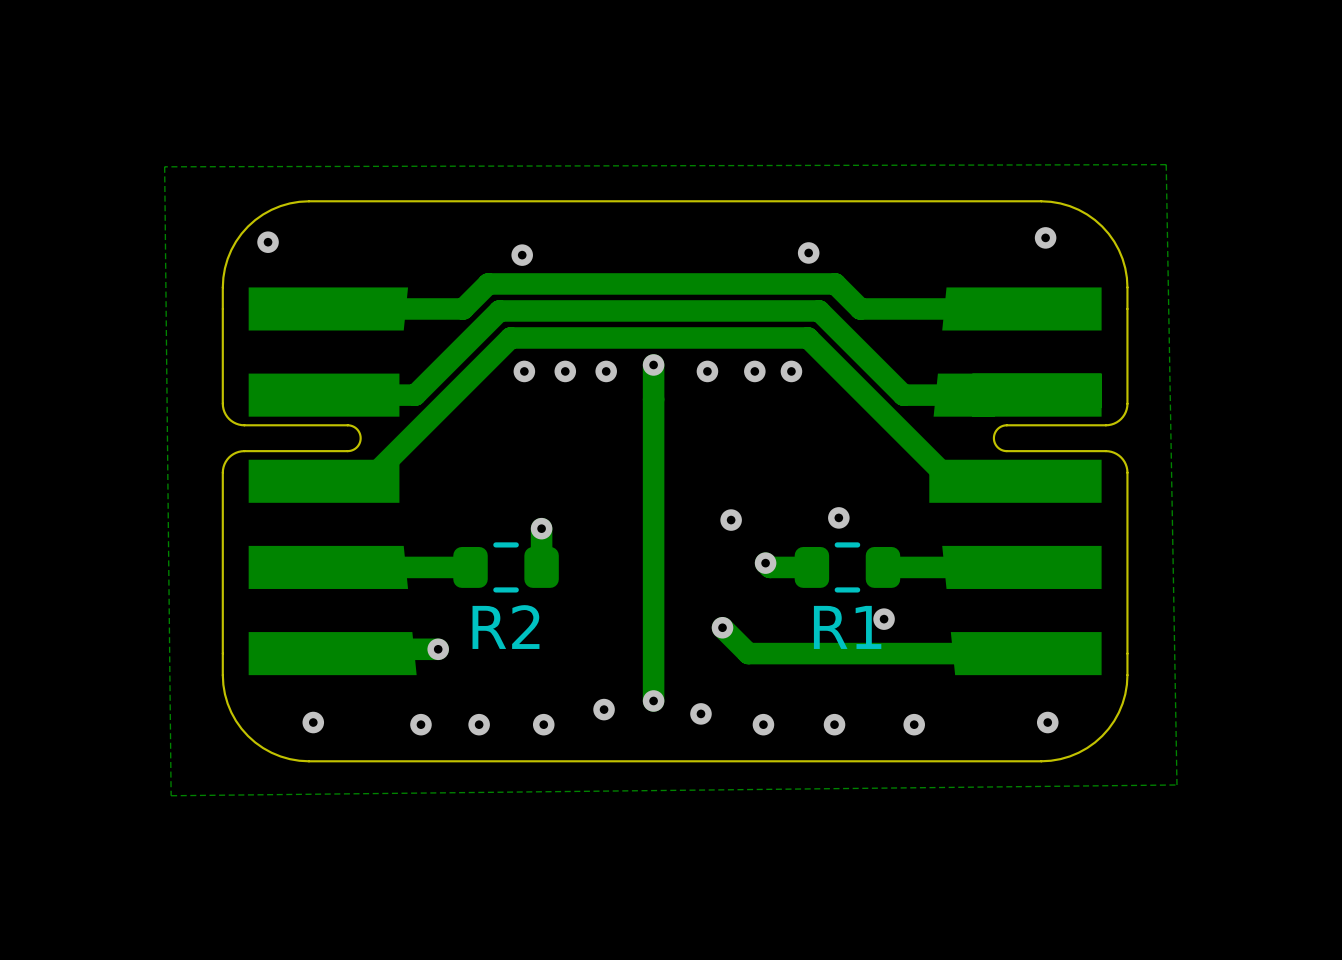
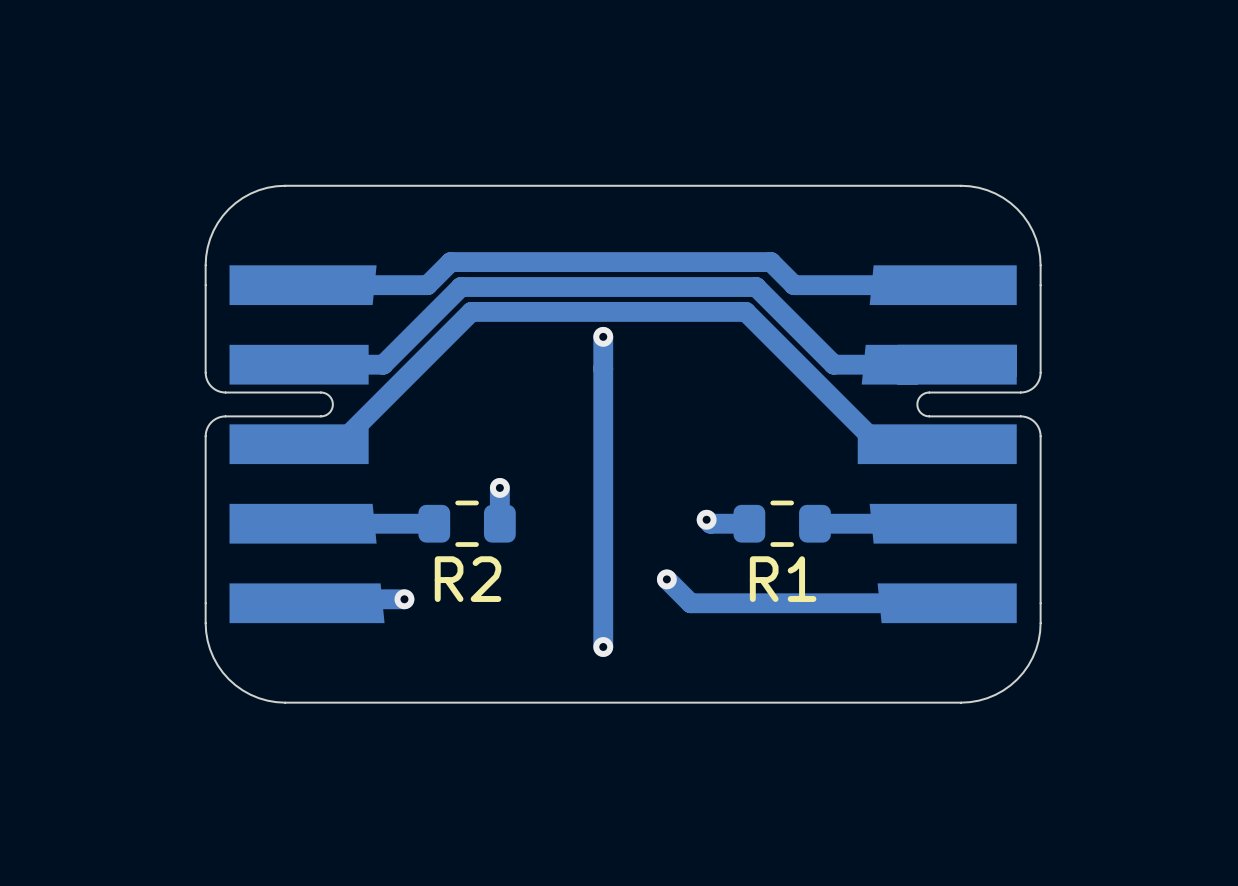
zone outline: (1166, 164) (1176, 784) (171, 795) (164, 166) (1166, 164) -> none
via: (1045, 237) -> none
via: (268, 242) -> none
via: (808, 252) -> none
via: (522, 255) -> none
via: (524, 371) -> none
via: (565, 371) -> none
via: (606, 371) -> none
via: (707, 371) -> none
via: (754, 371) -> none
via: (791, 371) -> none
via: (838, 517) -> none
via: (731, 520) -> none
via: (884, 619) -> none
via: (604, 709) -> none
via: (700, 713) -> none
via: (313, 722) -> none
via: (1047, 722) -> none
via: (420, 724) -> none
via: (479, 724) -> none
via: (543, 724) -> none
via: (763, 724) -> none
via: (834, 724) -> none
via: (914, 724) -> none

